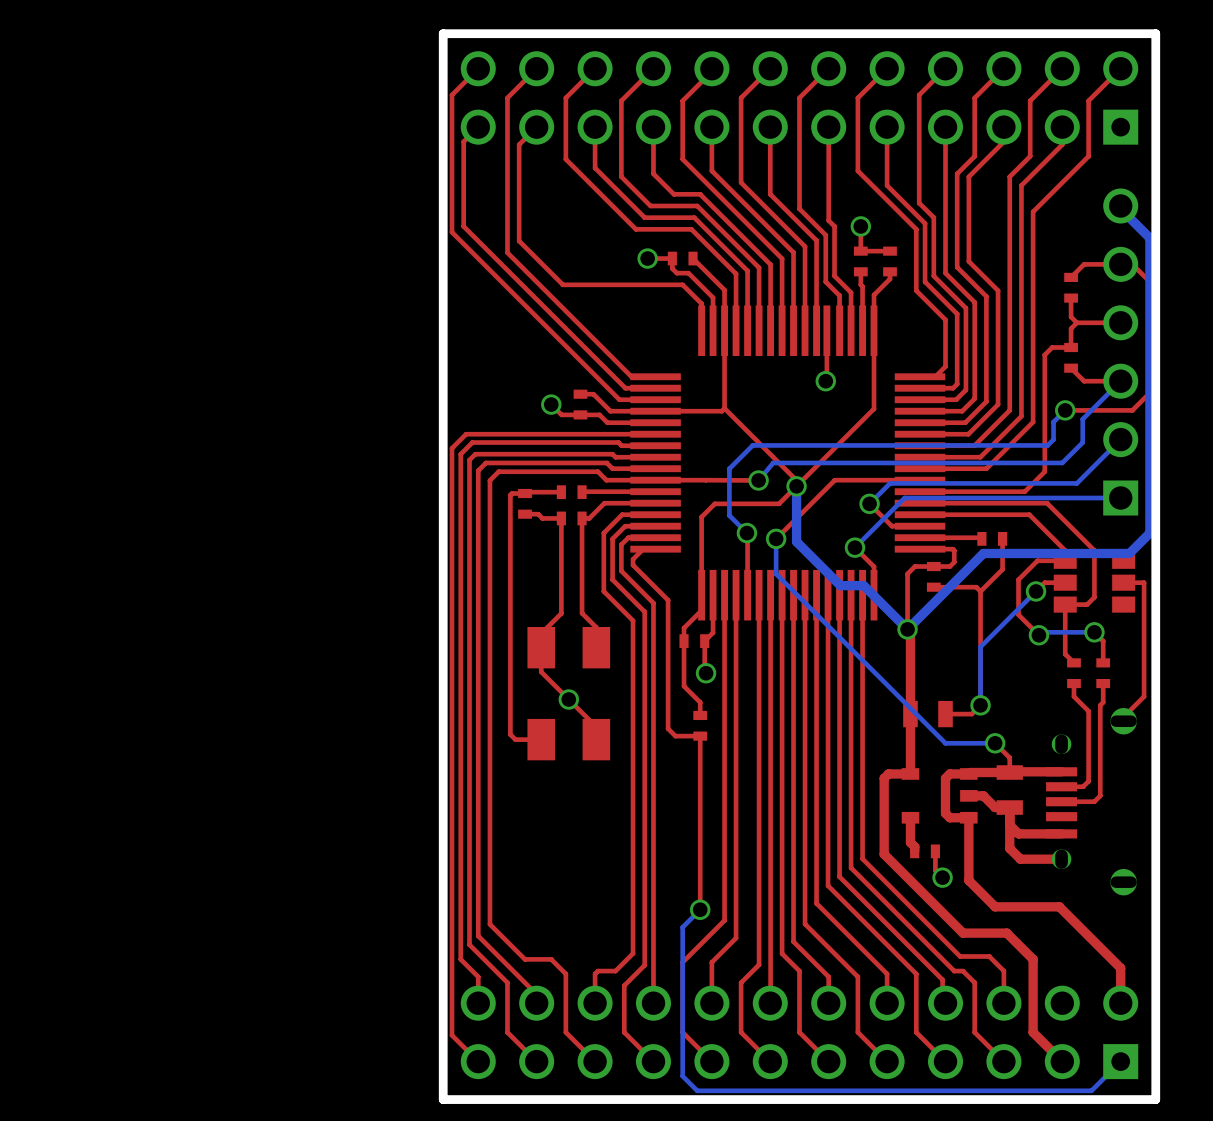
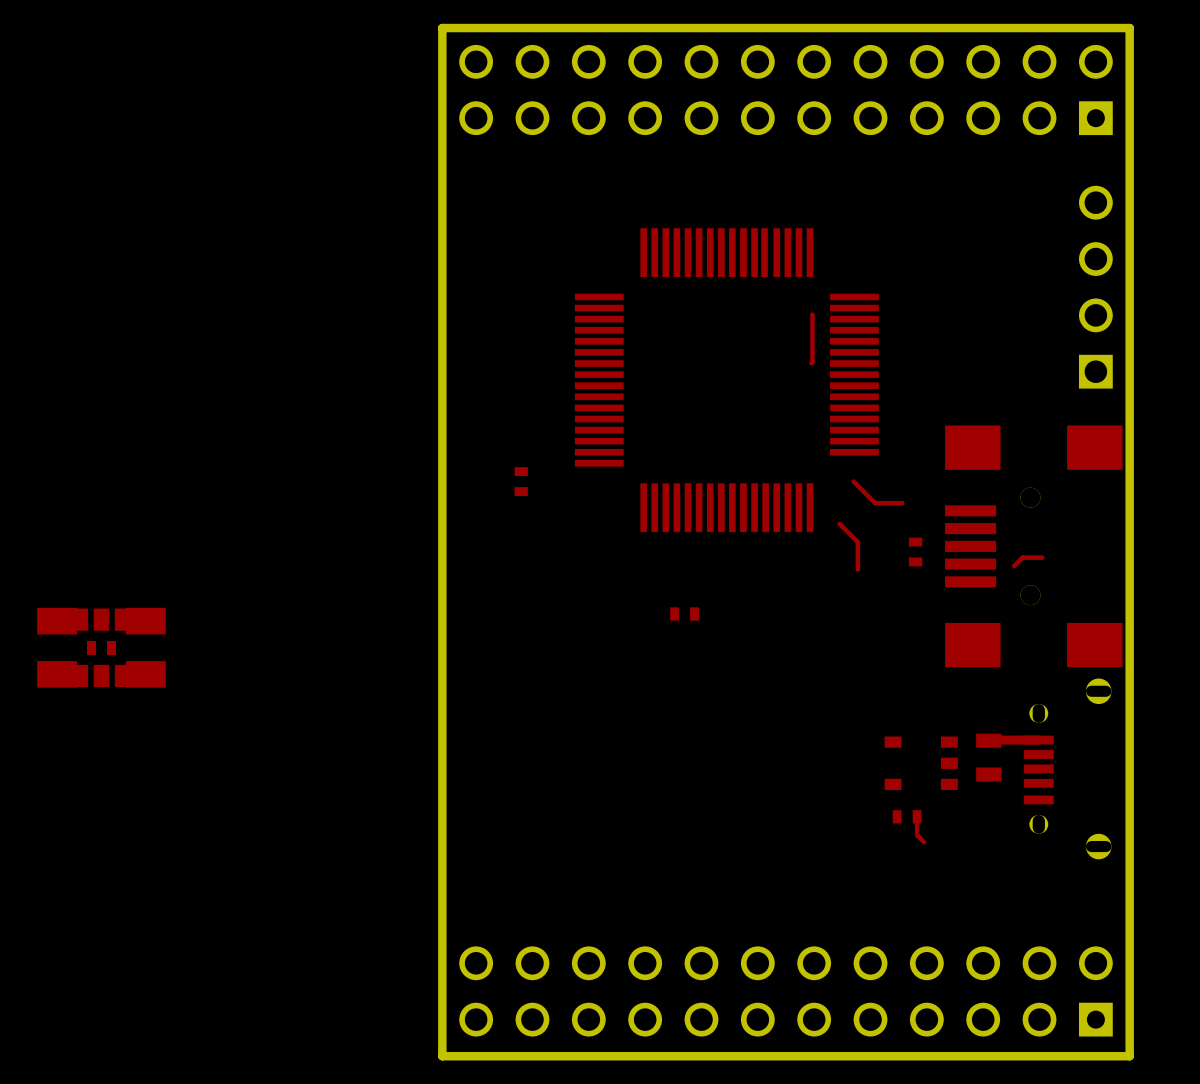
top track: (478, 68) (451, 95) (451, 232) (619, 399) (655, 399) -> none
top track: (536, 68) (507, 97) (507, 252) (631, 376) (655, 376) -> none
top track: (595, 68) (565, 97) (565, 159) (635, 229) (691, 229) (736, 273) (736, 330) -> none
top track: (653, 68) (621, 100) (621, 176) (650, 205) (697, 205) (759, 267) (759, 330) -> none
top track: (711, 68) (711, 71) (682, 100) (682, 159) (782, 258) (782, 330) -> none
top track: (770, 68) (741, 97) (741, 182) (805, 246) (805, 330) -> none
top track: (828, 68) (799, 97) (799, 208) (825, 235) (825, 281) (839, 295) (839, 330) -> none
top track: (887, 68) (857, 97) (857, 170) (916, 229) (916, 290) (945, 319) (945, 366) (935, 376) (920, 376) -> none
top track: (945, 68) (919, 95) (919, 203) (933, 217) (933, 276) (965, 308) (965, 389) (956, 399) (920, 399) -> none
top track: (1003, 68) (974, 97) (974, 156) (957, 173) (957, 267) (986, 296) (986, 401) (965, 422) (920, 422) -> none
top track: (1062, 68) (1030, 100) (1030, 156) (1009, 176) (1009, 410) (974, 445) (920, 445) -> none
top track: (1120, 68) (1088, 100) (1088, 156) (1033, 211) (1033, 422) (986, 468) (920, 468) -> none
top track: (478, 127) (463, 141) (463, 226) (625, 388) (655, 388) -> none
top track: (536, 127) (519, 144) (519, 241) (562, 284) (682, 284) (701, 303) (701, 330) -> none
top track: (595, 127) (595, 168) (644, 217) (694, 217) (747, 270) (747, 330) -> none
top track: (653, 127) (653, 173) (673, 194) (700, 194) (770, 264) (770, 330) -> none
top track: (711, 127) (711, 170) (793, 252) (793, 330) -> none
top track: (770, 127) (770, 194) (816, 240) (816, 330) -> none
top track: (828, 127) (828, 220) (834, 226) (834, 276) (851, 292) (851, 330) -> none
top track: (887, 127) (887, 185) (925, 223) (925, 281) (957, 314) (957, 384) (953, 388) (920, 388) -> none
top track: (945, 127) (945, 273) (974, 302) (974, 398) (962, 411) (920, 411) -> none
top track: (1003, 127) (1003, 141) (968, 176) (968, 261) (998, 290) (998, 404) (968, 434) (920, 434) -> none
top track: (1062, 127) (1062, 144) (1021, 185) (1021, 416) (980, 457) (920, 457) -> none
bottom track: (1120, 205) (1120, 208) (1149, 238) (1149, 533) (1129, 553) (983, 553) (907, 629) (863, 585) (840, 585) (796, 541) (796, 486) -> none
top track: (860, 226) (860, 251) (890, 251) -> none
via: (860, 226) -> none
top track: (647, 258) (672, 258) (672, 268) (676, 273) (688, 273) (713, 297) (713, 330) -> none
via: (647, 258) -> none
part: (682, 258) -> none
top track: (693, 258) (724, 290) (724, 408) -> none
part: (860, 261) -> none
part: (890, 261) -> none
top track: (860, 271) (862, 330) -> none
top track: (890, 271) (890, 278) (874, 294) (874, 408) (779, 503) (714, 503) (701, 517) (701, 610) (684, 628) (684, 686) (700, 702) (700, 715) -> none
top track: (1071, 277) (1084, 264) (1132, 264) (1149, 281) (1149, 392) (1132, 410) (1065, 410) -> none
part: (1071, 287) -> none
top track: (1071, 298) (1071, 316) (1076, 322) -> none
part: none -> (1095, 287)
top track: (1076, 322) (1071, 328) (1071, 347) (1052, 347) (1044, 354) (1044, 471) (1024, 491) (920, 491) -> none
top track: (1120, 322) (1076, 322) -> none
part: (1120, 352) -> none
part: (1071, 357) -> none
top track: (1071, 368) (1084, 381) (1120, 381) -> none
via: (825, 381) -> none
bottom track: (1120, 381) (1082, 419) (1082, 442) (1062, 462) (773, 462) (758, 480) -> none
top track: (580, 394) (593, 394) (610, 411) (721, 411) (724, 408) -> none
part: none -> (726, 380)
top track: (551, 404) (561, 414) (599, 414) (607, 422) (655, 422) -> none
via: (551, 404) -> none
part: (580, 404) -> none
top track: (724, 408) (796, 480) (796, 489) -> none
bottom track: (1065, 410) (1053, 422) (1053, 439) (1047, 445) (752, 445) (729, 468) (729, 515) (746, 533) -> none
via: (1065, 410) -> none
top track: (655, 434) (466, 434) (451, 448) (451, 1035) (478, 1061) -> none
bottom track: (1120, 439) (1076, 483) (890, 483) (869, 503) -> none
top track: (655, 445) (621, 445) (618, 442) (472, 442) (460, 454) (460, 959) (478, 976) (478, 1003) -> none
top track: (655, 457) (615, 457) (612, 454) (475, 454) (469, 460) (469, 944) (507, 982) (507, 1032) (536, 1061) -> none
part: (787, 462) -> none
top track: (655, 468) (612, 468) (606, 462) (485, 462) (478, 470) (478, 936) (536, 994) (536, 1003) -> none
top track: (758, 480) (606, 480) (598, 471) (498, 471) (489, 480) (489, 924) (524, 959) (551, 959) (565, 974) (565, 1032) (595, 1061) -> none
via: (758, 480) -> none
top track: (920, 480) (834, 480) (776, 538) -> none
via: (796, 486) -> none
top track: (655, 491) (582, 492) -> none
top track: (561, 492) (526, 492) (510, 495) (510, 734) (515, 739) (541, 739) -> none
part: (571, 492) -> none
bottom track: (1120, 498) (904, 498) (854, 547) -> none
top track: (655, 503) (604, 503) (589, 518) (582, 518) (582, 613) (596, 627) (596, 647) -> none
via: (869, 503) -> none
top track: (920, 503) (1047, 503) (1094, 550) (1094, 597) (1087, 604) (1065, 604) (1065, 654) (1073, 662) -> none
top track: (524, 514) (538, 514) (542, 518) (561, 518) (561, 613) (541, 633) (541, 671) (596, 727) (596, 739) -> none
top track: (655, 514) (622, 514) (603, 533) (603, 591) (633, 620) (633, 953) (615, 971) (598, 971) (595, 974) (595, 1003) -> none
top track: (920, 514) (1029, 514) (1065, 550) (1065, 560) (1037, 560) (1018, 579) (1018, 614) (1038, 635) -> none
part: (571, 518) -> none
top track: (655, 526) (625, 526) (612, 538) (612, 579) (644, 611) (644, 965) (624, 985) (624, 1032) (653, 1061) -> none
top track: (746, 533) (747, 595) -> none
via: (746, 533) -> none
top track: (655, 537) (628, 537) (621, 544) (621, 571) (653, 603) (653, 1003) -> none
top track: (920, 537) (981, 538) -> none
bottom track: (776, 538) (776, 573) (945, 743) (995, 743) -> none
via: (776, 538) -> none
part: (992, 538) -> none
top track: (1002, 538) (1002, 569) (980, 591) -> none
via: (854, 547) -> none
top track: (655, 549) (643, 549) (633, 559) (633, 565) (668, 600) (668, 728) (675, 736) (700, 736) (700, 909) -> none
top track: (920, 549) (952, 549) (954, 562) (950, 566) (914, 566) (907, 573) (907, 629) (910, 632) (910, 773) (888, 773) (884, 778) (884, 854) (963, 933) (1006, 933) (1033, 959) (1033, 1032) (1062, 1061) -> none
part: none -> (1033, 546)
part: (1094, 582) -> none
top track: (1123, 582) (1144, 582) (1144, 696) (1123, 717) (1123, 721) -> none
top track: (933, 587) (976, 587) (980, 591) -> none
top track: (980, 591) (980, 705) (971, 714) (945, 714) -> none
bottom track: (1036, 591) (980, 646) (980, 705) -> none
via: (1036, 591) -> none
top track: (713, 595) (713, 632) (704, 641) (706, 673) -> none
top track: (724, 595) (724, 920) (682, 962) (682, 1032) (711, 1061) -> none
top track: (736, 595) (736, 938) (711, 962) (711, 1003) -> none
top track: (759, 595) (759, 964) (741, 982) (741, 1032) (770, 1061) -> none
top track: (770, 595) (770, 1002) -> none
top track: (782, 595) (782, 953) (799, 971) (799, 1032) (828, 1061) -> none
top track: (793, 595) (793, 941) (828, 976) (828, 1003) -> none
top track: (805, 595) (805, 924) (857, 976) (857, 1032) (887, 1061) -> none
top track: (816, 595) (816, 903) (887, 974) (887, 1003) -> none
top track: (828, 595) (828, 885) (916, 974) (916, 1032) (945, 1061) -> none
top track: (839, 595) (839, 876) (942, 979) (942, 1000) (945, 1003) -> none
top track: (851, 595) (851, 867) (954, 971) (963, 971) (974, 982) (974, 1032) (1003, 1061) -> none
top track: (862, 595) (862, 858) (960, 956) (989, 956) (1003, 971) (1003, 1003) -> none
via: (907, 629) -> none
top track: (1094, 632) (1103, 641) (1103, 662) -> none
bottom track: (1094, 632) (1041, 632) (1038, 635) -> none
via: (1094, 632) -> none
via: (1038, 635) -> none
via: (706, 673) -> none
part: (1073, 673) -> none
part: (1103, 673) -> none
part: none -> (101, 647)
part: none -> (101, 647)
top track: (1073, 683) (1073, 696) (1088, 711) (1088, 781) (1083, 786) (1061, 786) -> none
top track: (1103, 683) (1103, 702) (1100, 705) (1100, 795) (1094, 801) (1061, 801) -> none
part rotation: 0° (568, 693) -> 90° clockwise (101, 647)
part position: (568, 693) -> (101, 647)
via: (568, 699) -> none
via: (980, 705) -> none
part: (927, 714) -> none
part: (700, 725) -> none
top track: (995, 743) (1009, 757) (1009, 772) (949, 773) (945, 778) (945, 813) (949, 817) (968, 817) (968, 880) (995, 906) (1059, 906) (1120, 968) (1120, 1003) -> none
via: (995, 743) -> none
top track: (968, 795) (983, 795) (995, 807) (1009, 807) (1009, 848) (1020, 859) (1061, 859) -> none
top track: (910, 817) (910, 842) (914, 846) (914, 851) -> none
top track: (1009, 825) (1018, 833) (1061, 833) -> none
via: (942, 877) -> none
bottom track: (700, 909) (682, 927) (682, 1076) (697, 1090) (1091, 1090) (1120, 1061) -> none
via: (700, 909) -> none

